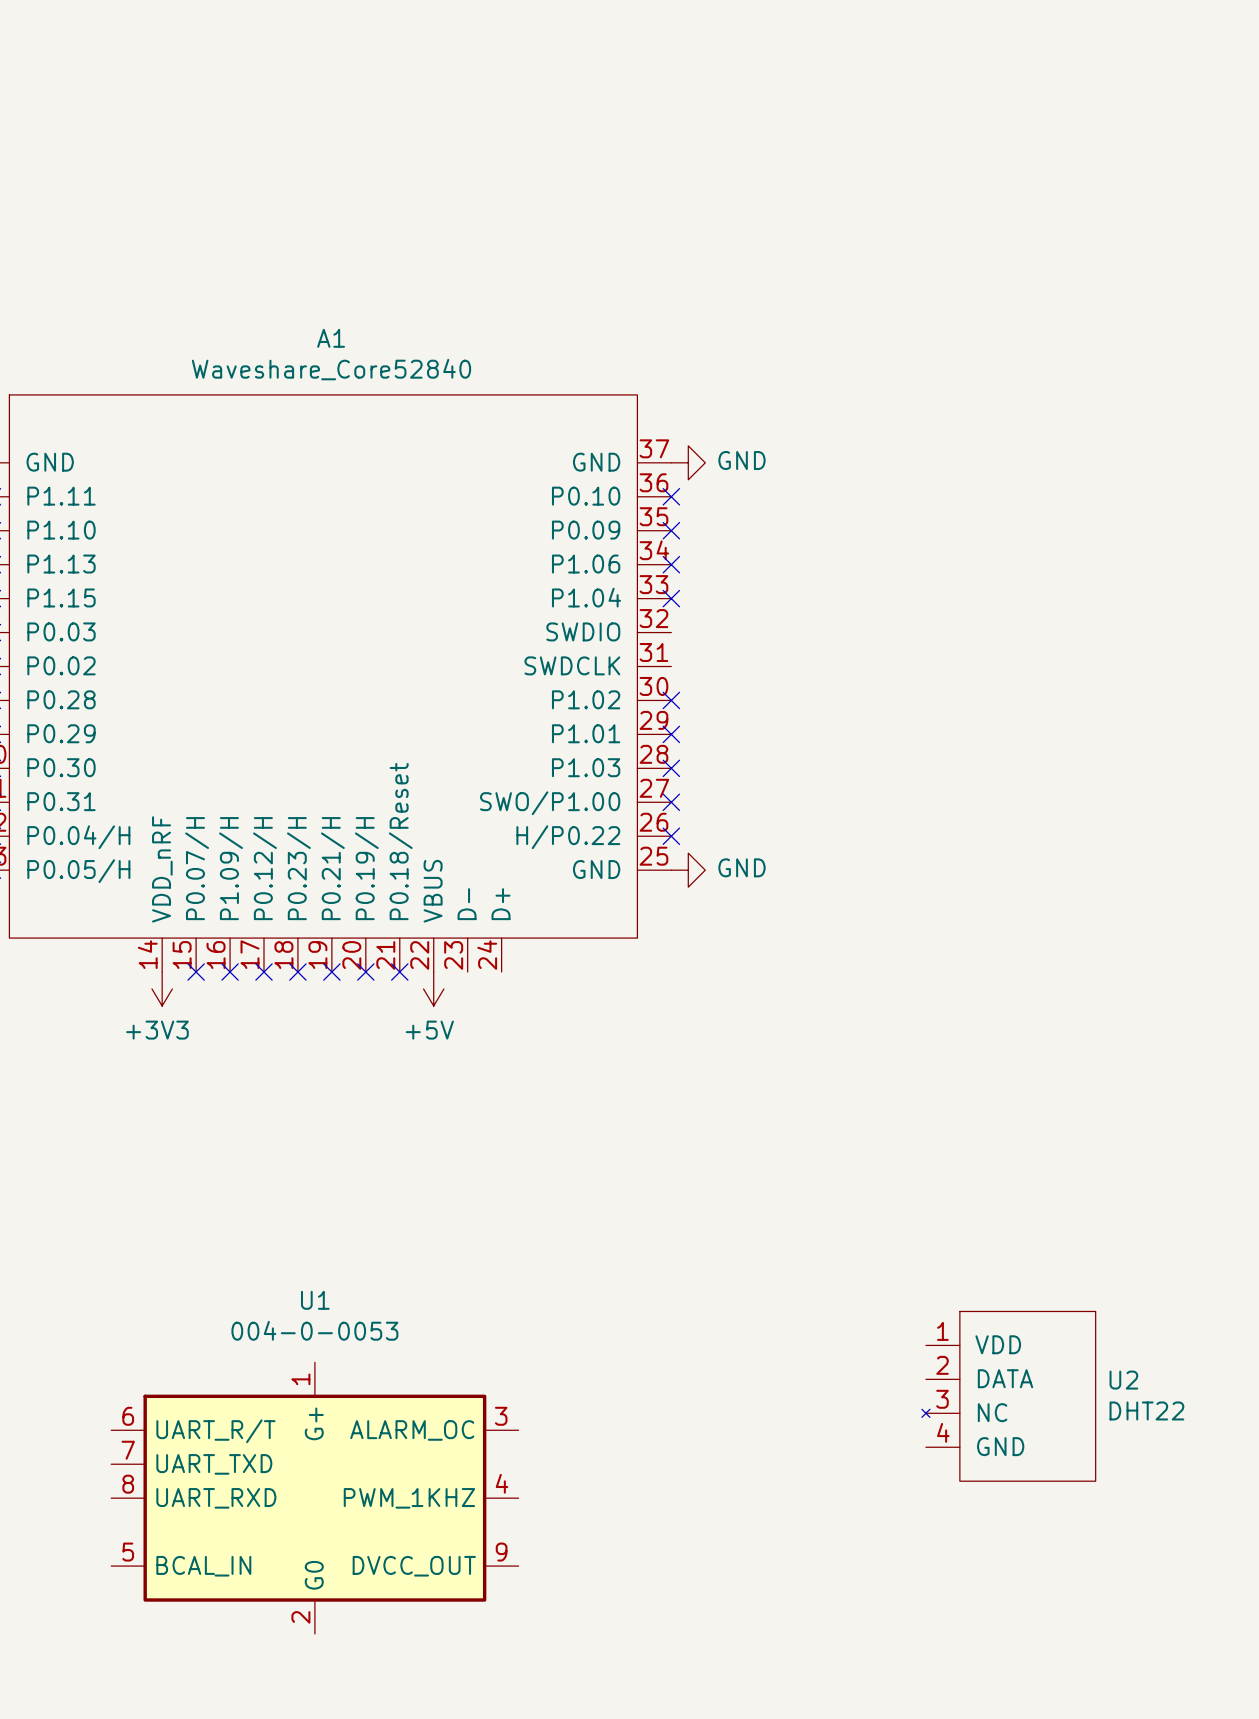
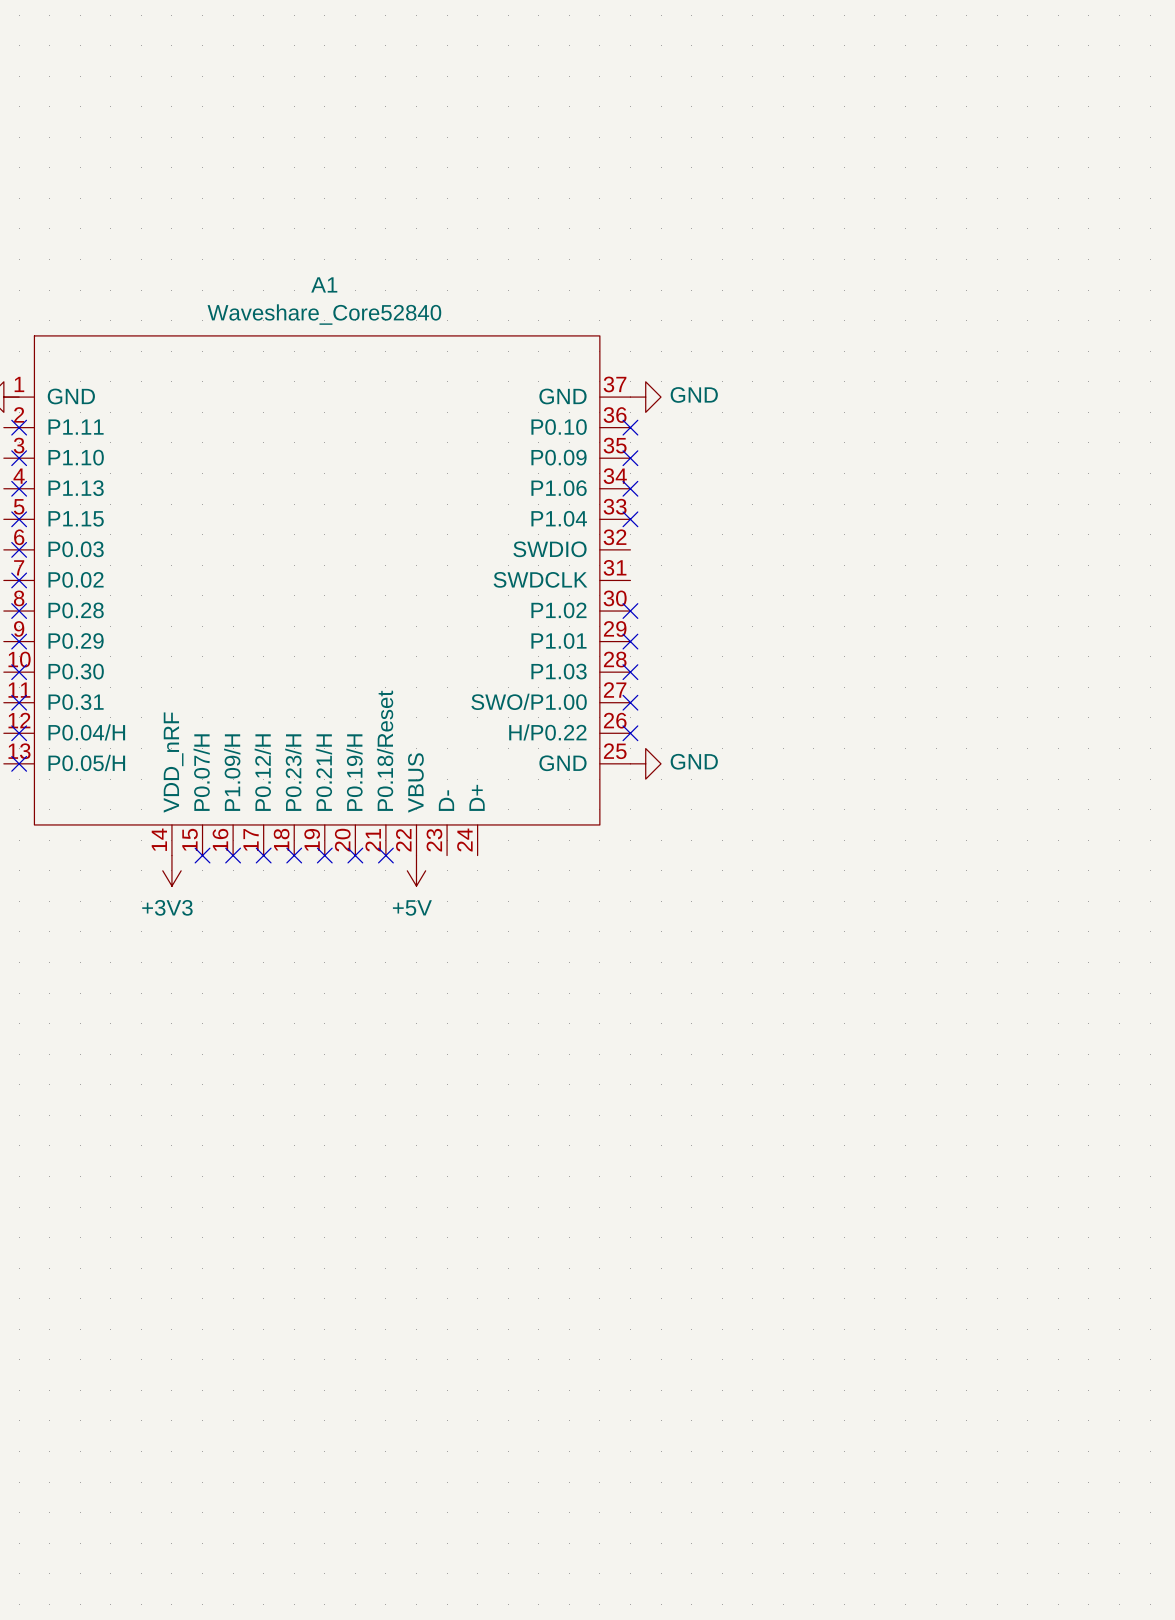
U2: DHT22 (1008, 1396) -> none
U1: 004-0-0053 (314, 1498) -> none

